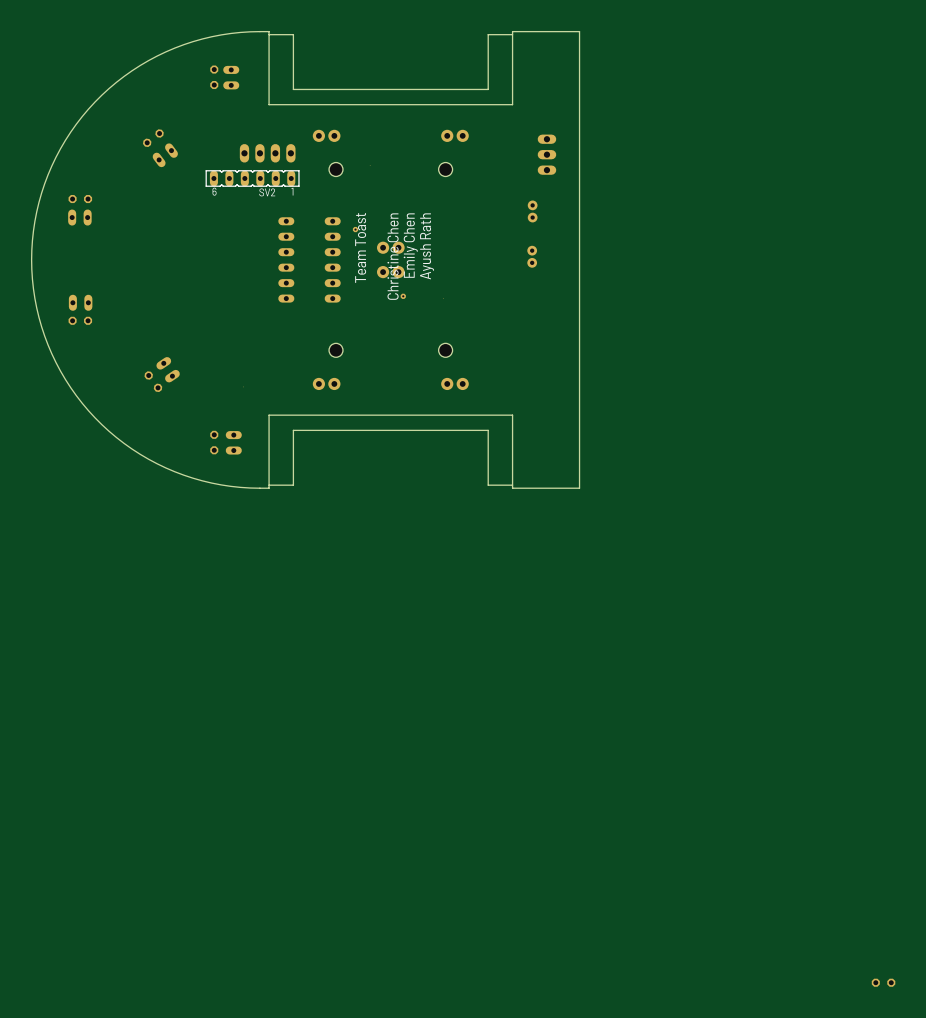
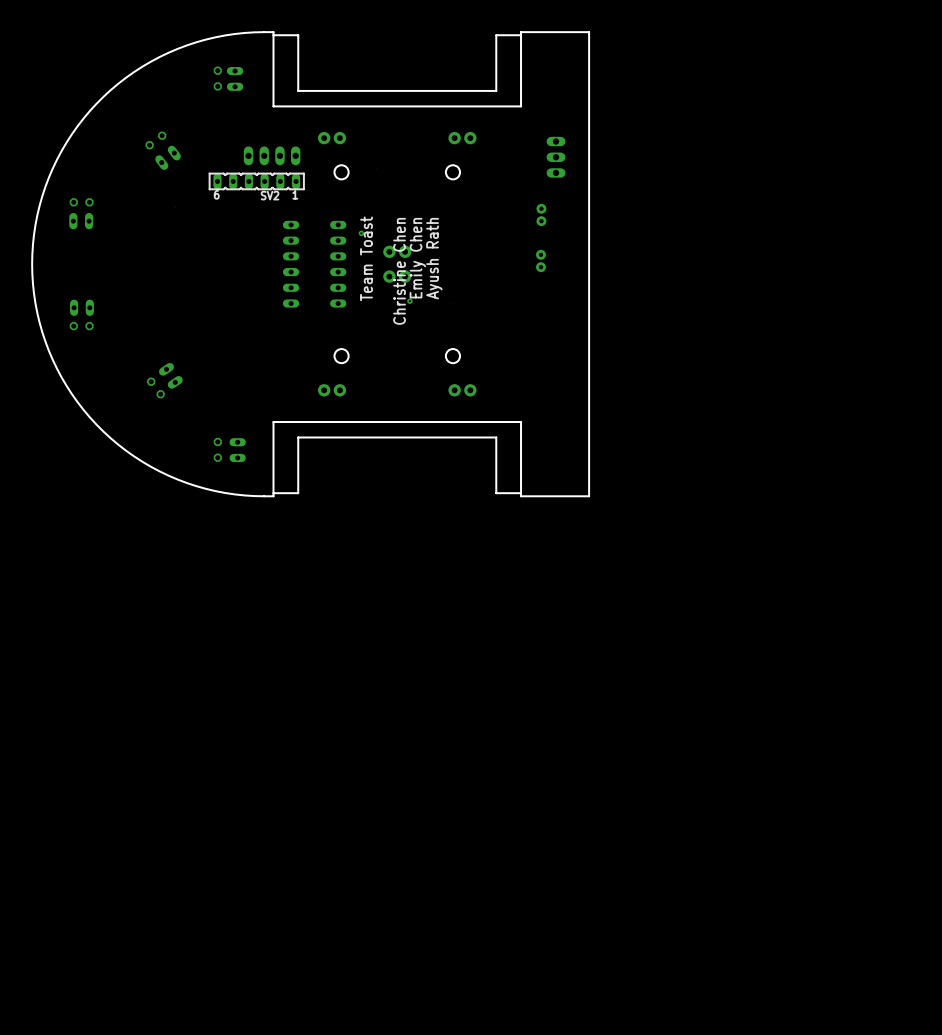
part: (883, 982) -> none

